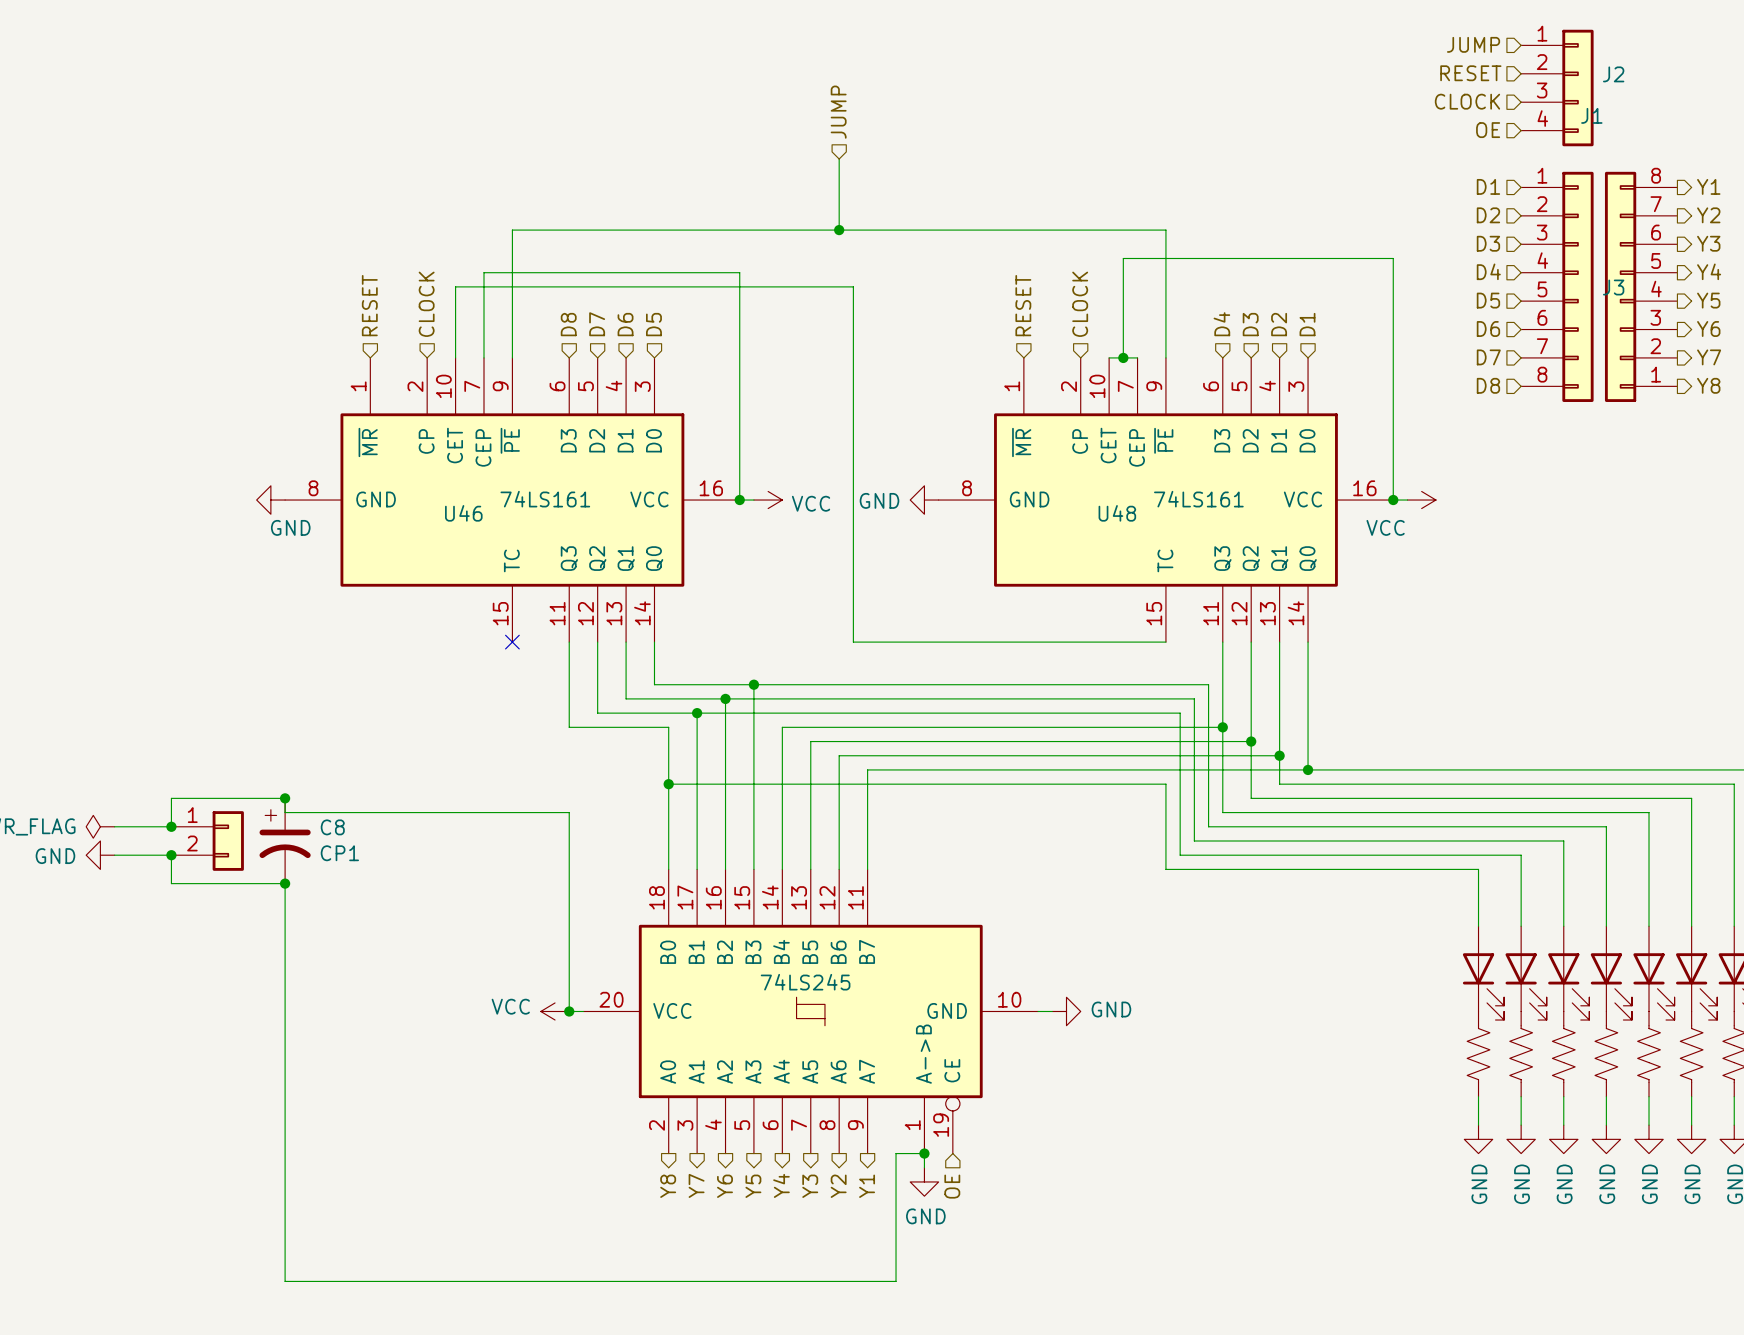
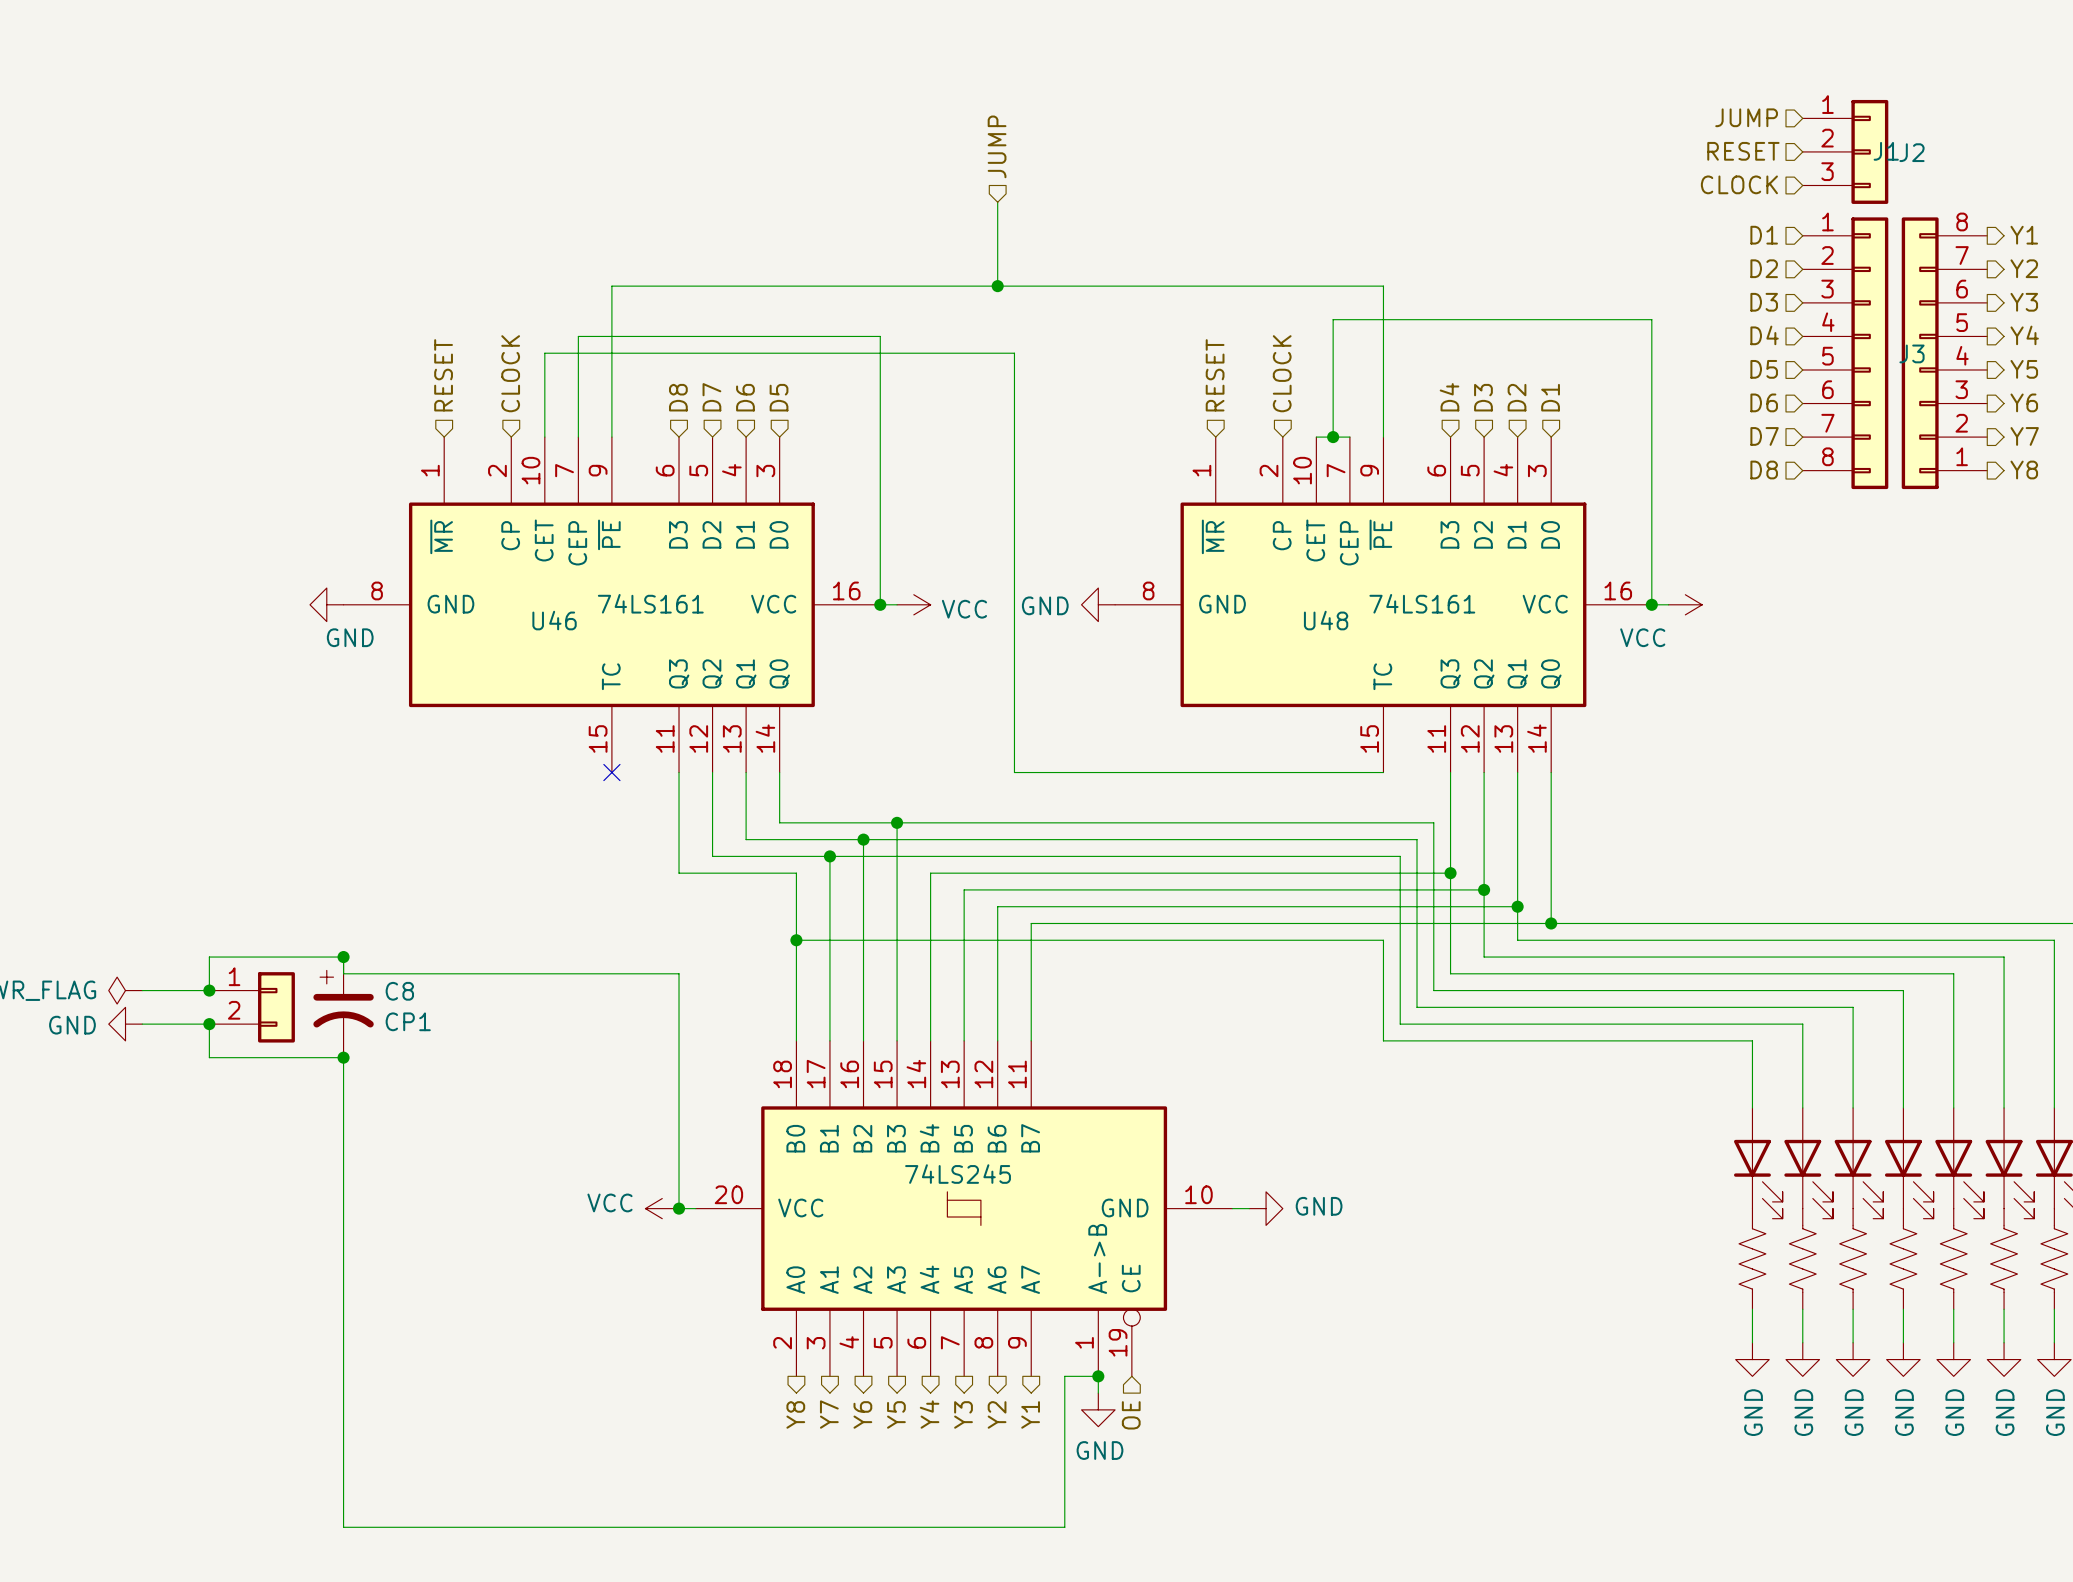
J2 symbol: [1521, 29, 1594, 147] -> [1802, 99, 1889, 204]
hierarchical label position: JUMP (1473, 44) -> JUMP (1746, 117)
hierarchical label position: RESET (1470, 73) -> RESET (1743, 151)
hierarchical label position: CLOCK (1467, 101) -> CLOCK (1739, 184)
hierarchical label: OE (1488, 130) -> none

